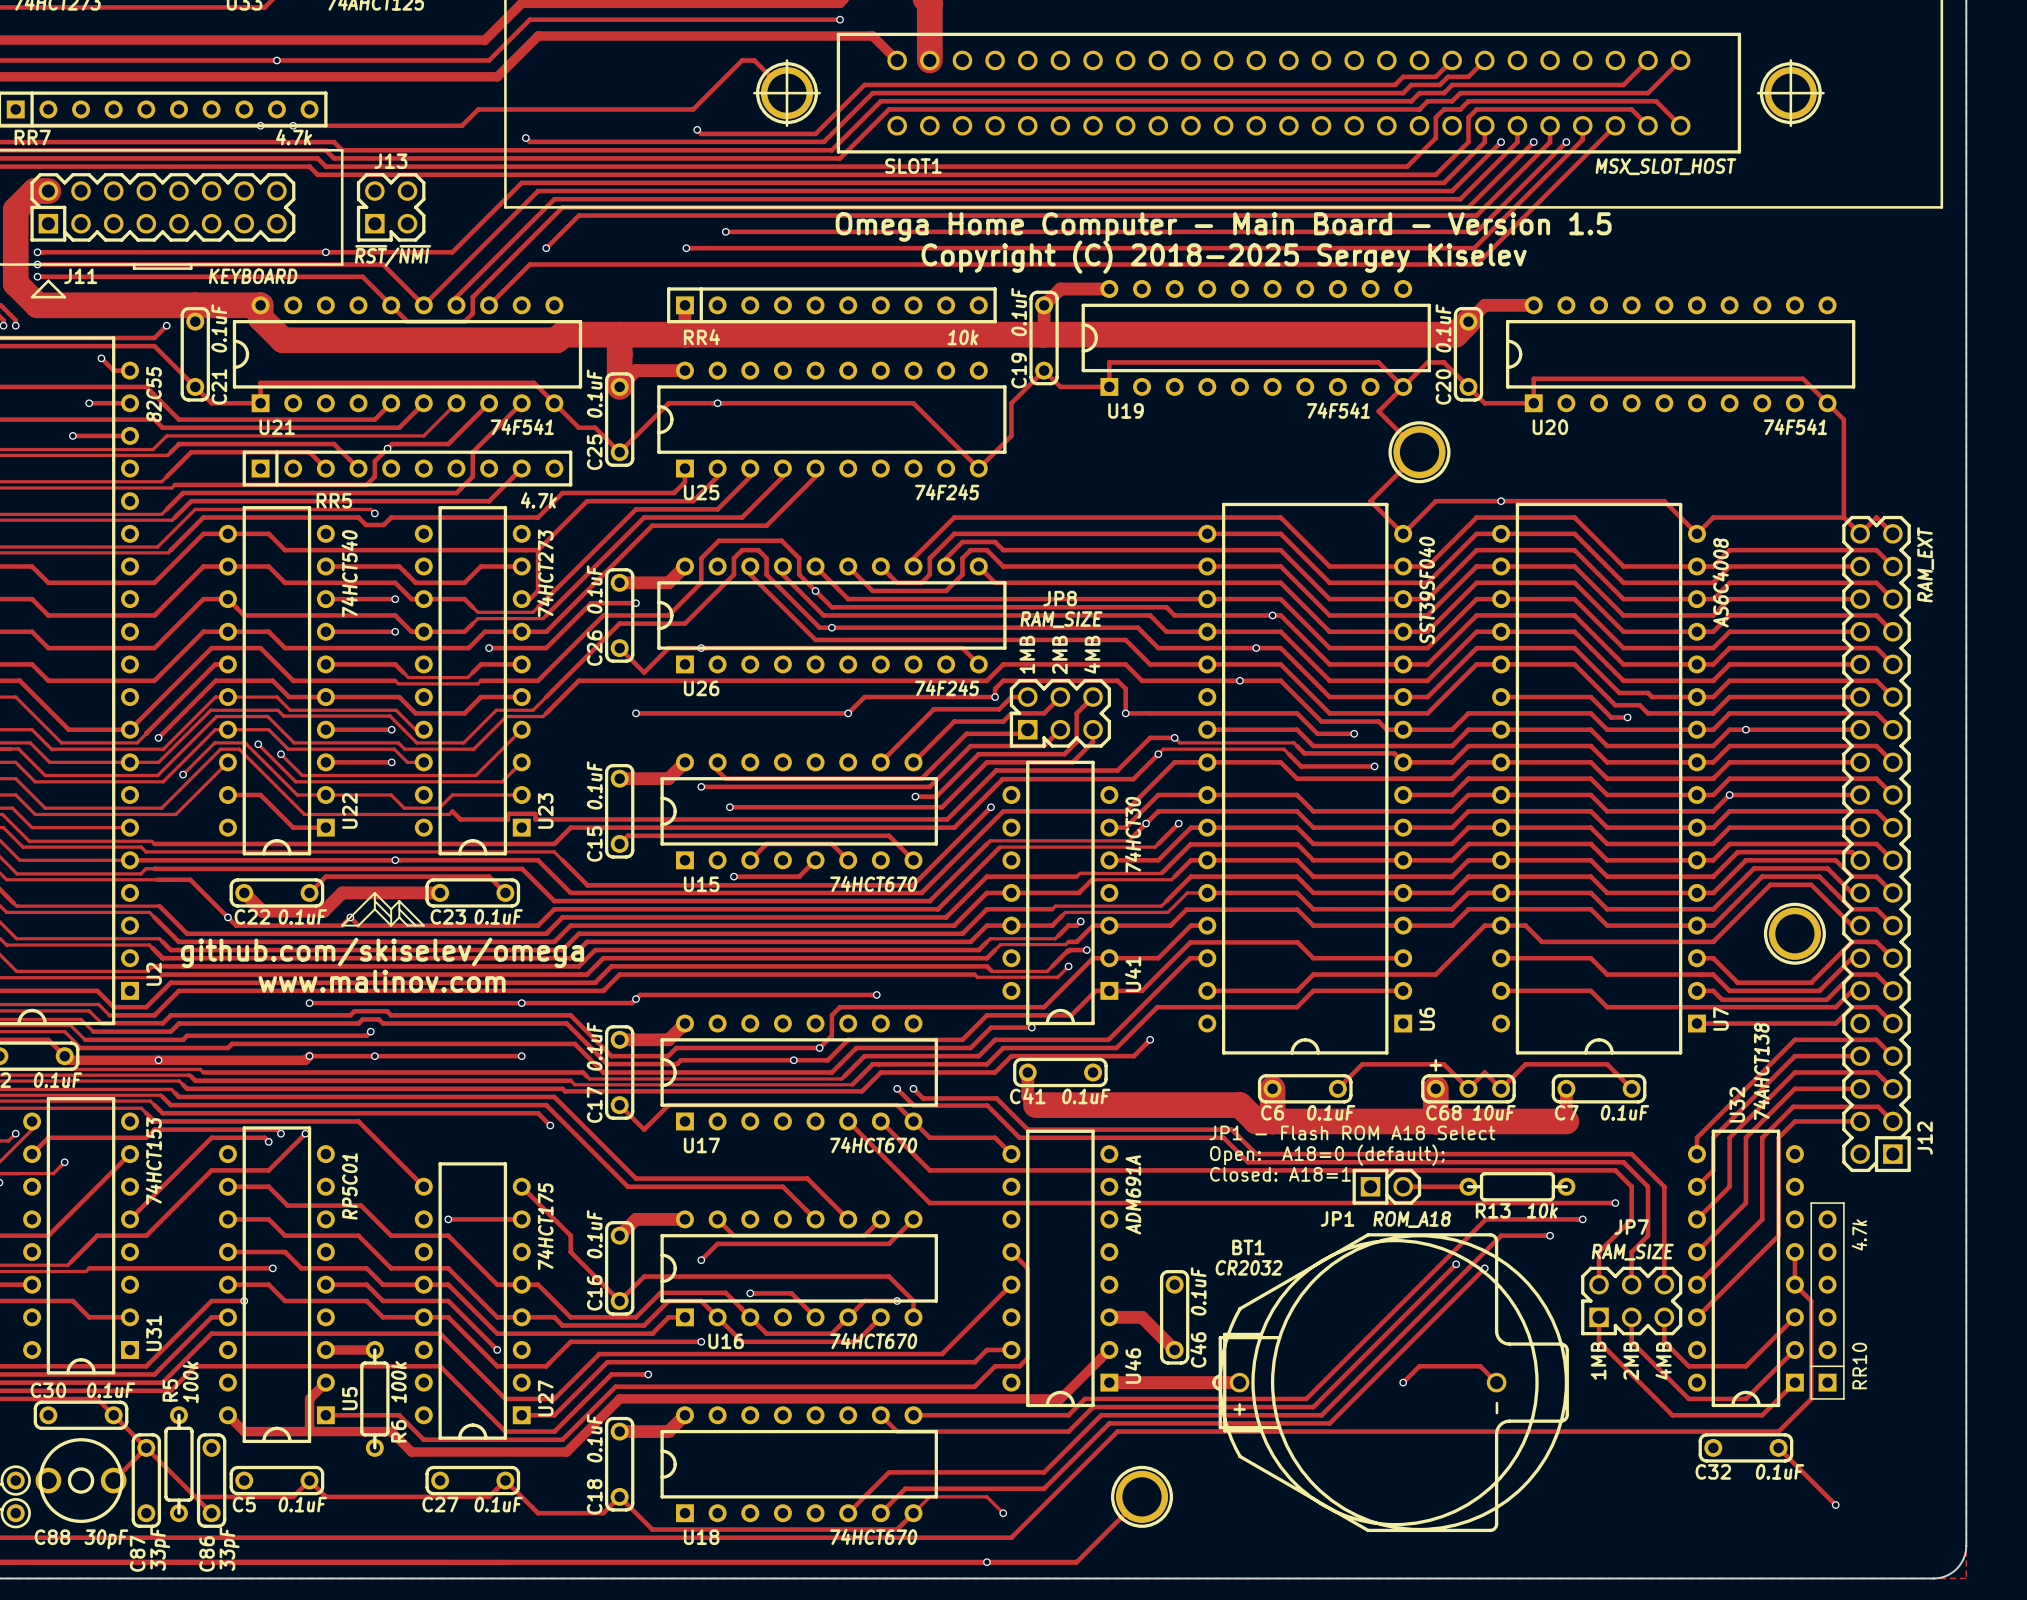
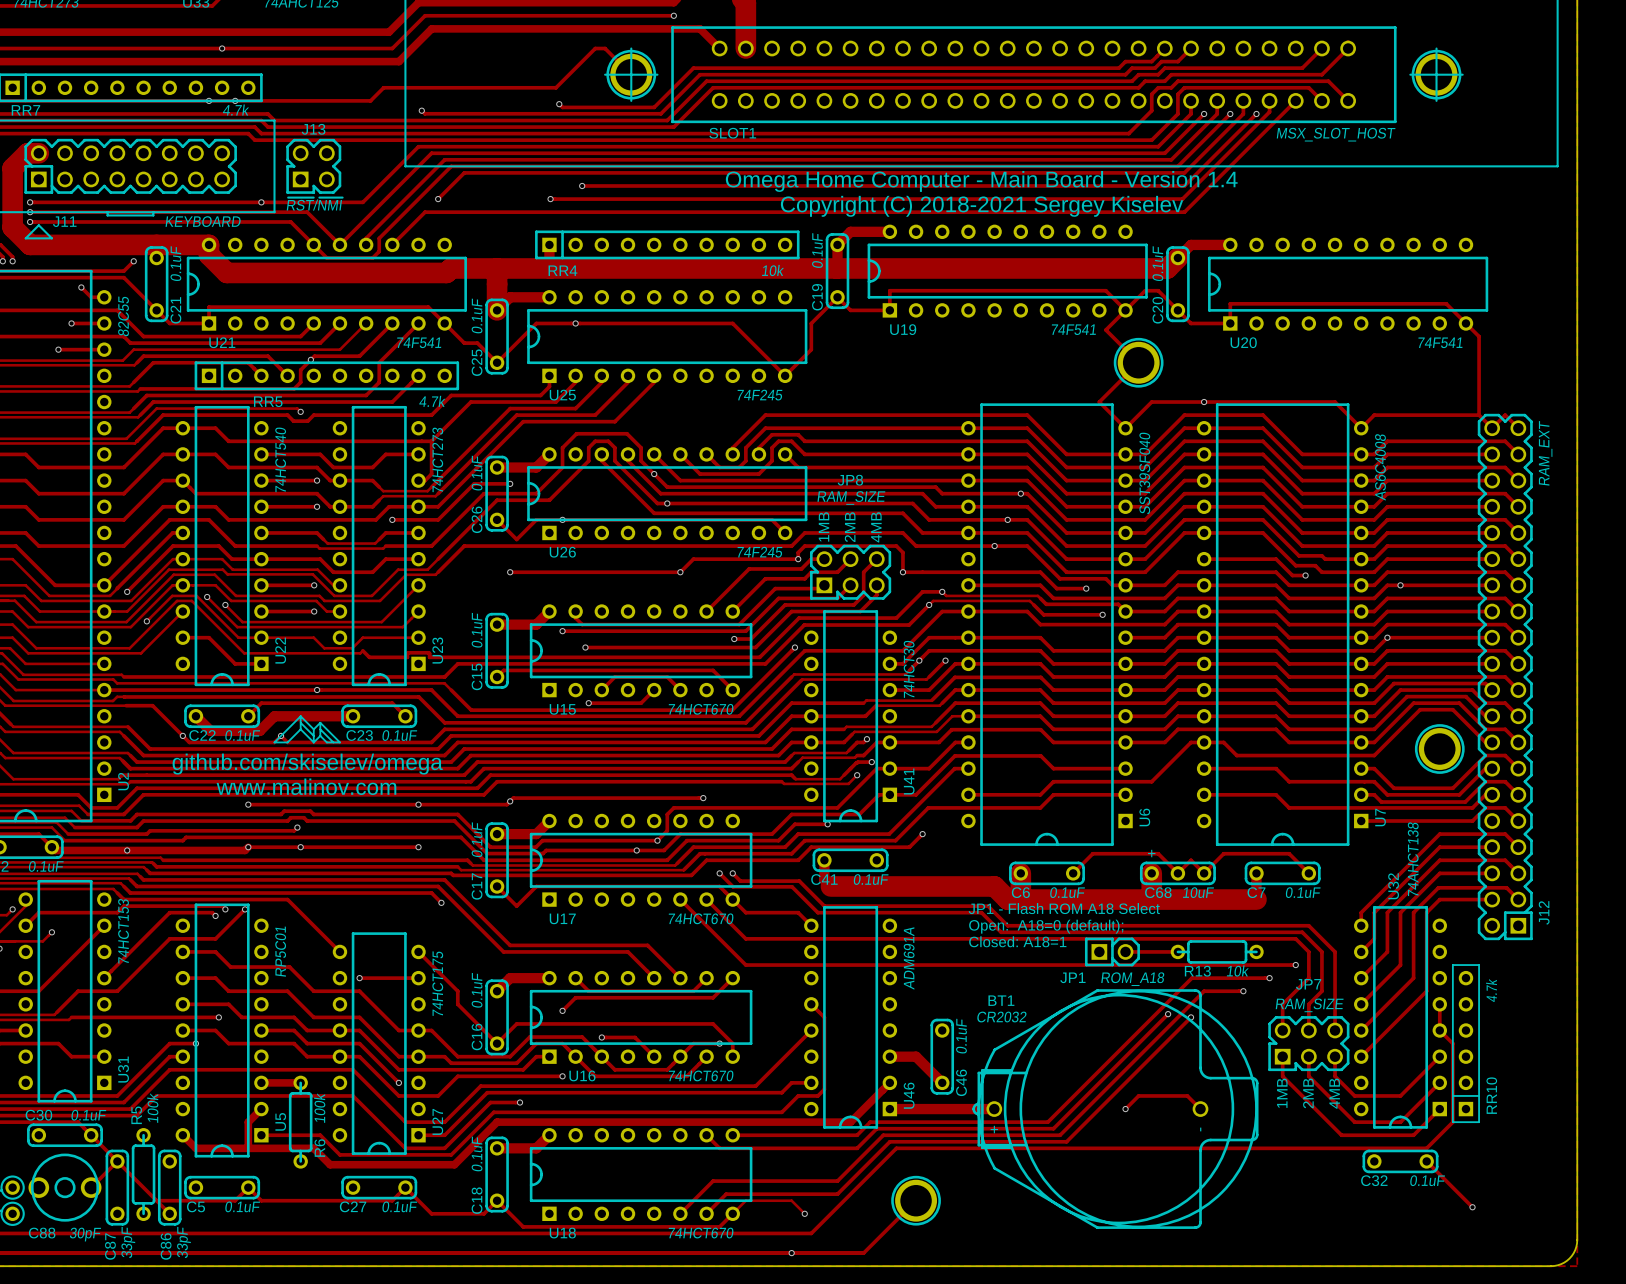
text: Omega Home Computer - Main Board - Version 1.5 (1223, 227) -> Omega Home Computer - Main Board - Version 1.4 (981, 181)
text: Copyright (C) 2018-2025 Sergey Kiselev (1224, 257) -> Copyright (C) 2018-2021 Sergey Kiselev (982, 206)

